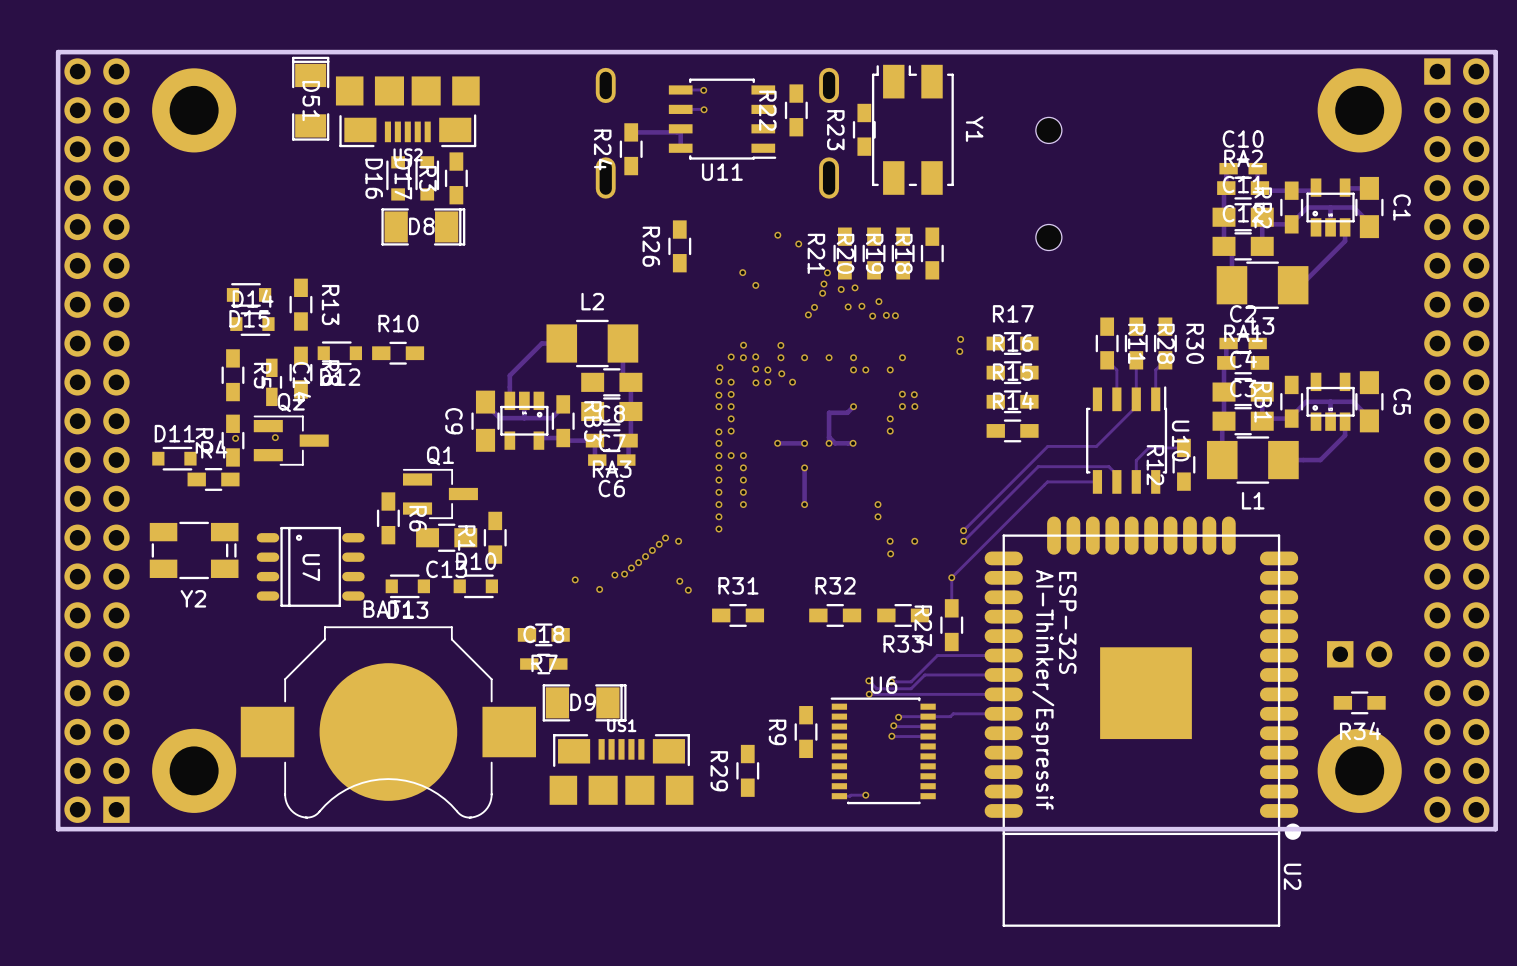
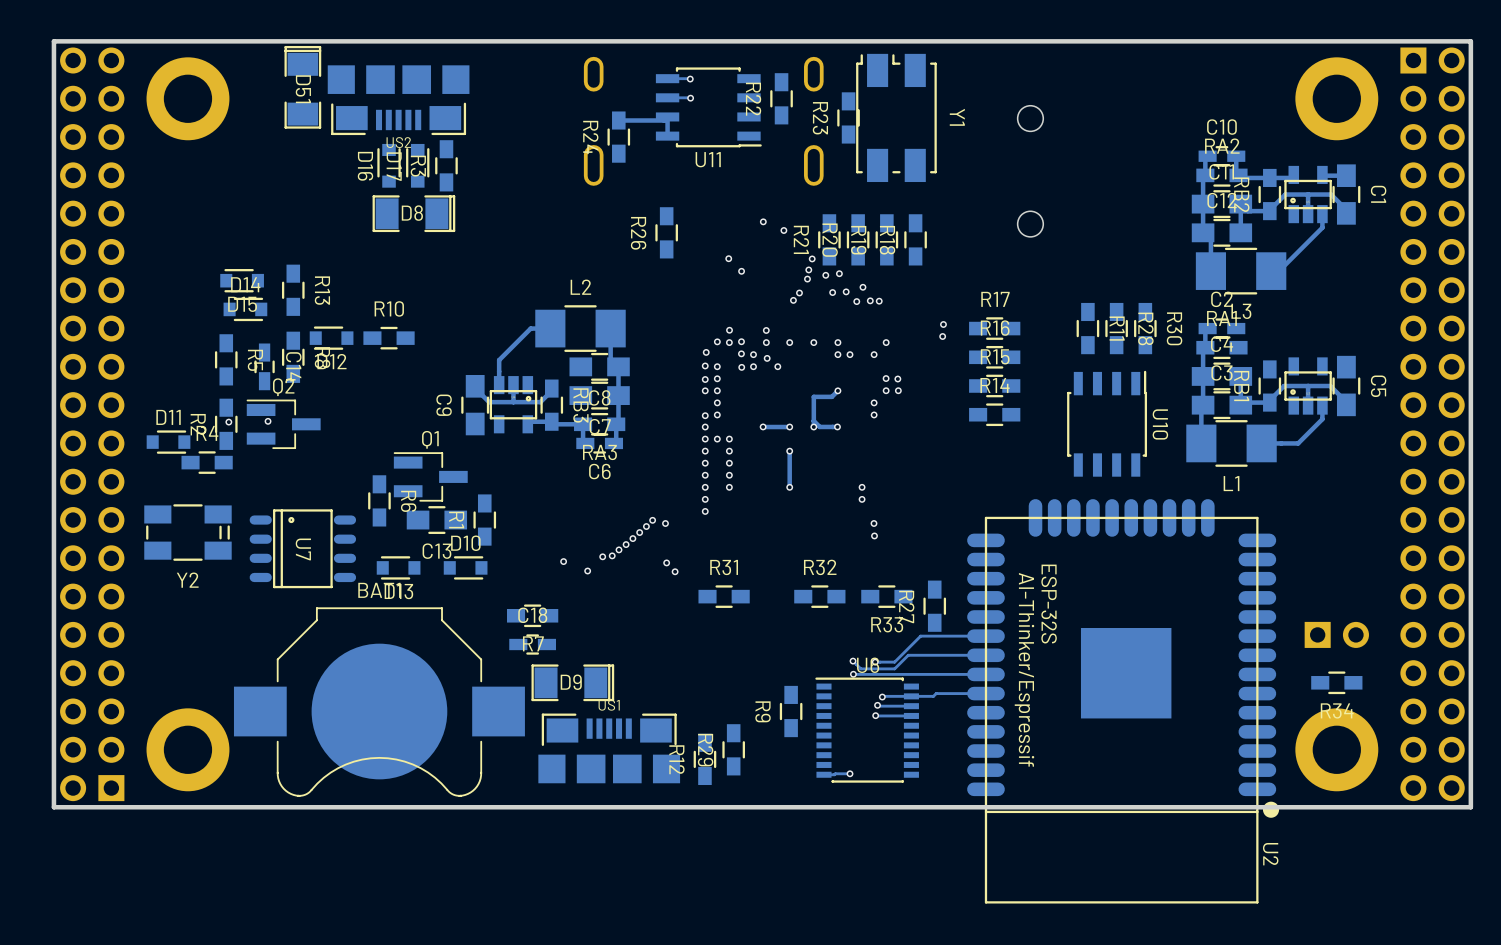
track: (1107, 360) (1116, 370) (1116, 399) -> none
track: (1136, 360) (1136, 406) (1096, 446) (1047, 446) (963, 530) -> none
track: (1165, 360) (1155, 370) (1155, 399) -> none
track: (1183, 447) (1148, 447) (1136, 460) (1136, 481) -> none
R12 position: (1183, 464) -> (704, 759)
track: (1097, 481) (1047, 481) (951, 577) (951, 608) -> none
track: (1116, 481) (1116, 474) (1108, 466) (1038, 466) (963, 541) -> none
via: (963, 530) -> none
via: (914, 541) -> none
via: (963, 541) -> none
via: (951, 577) -> none

